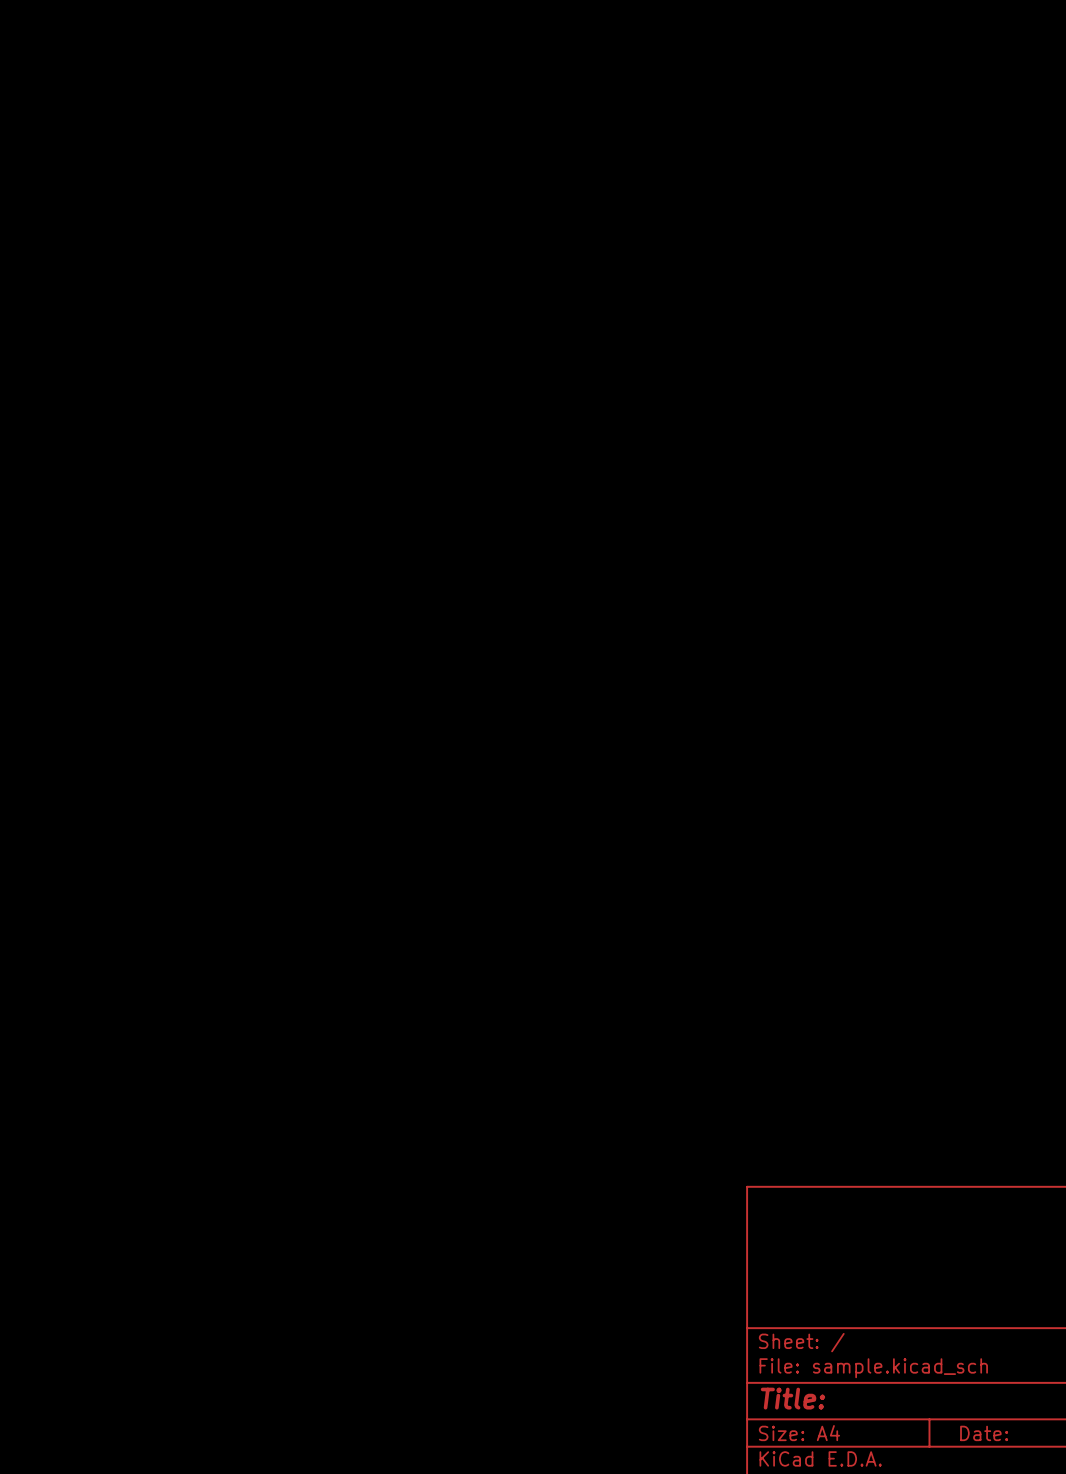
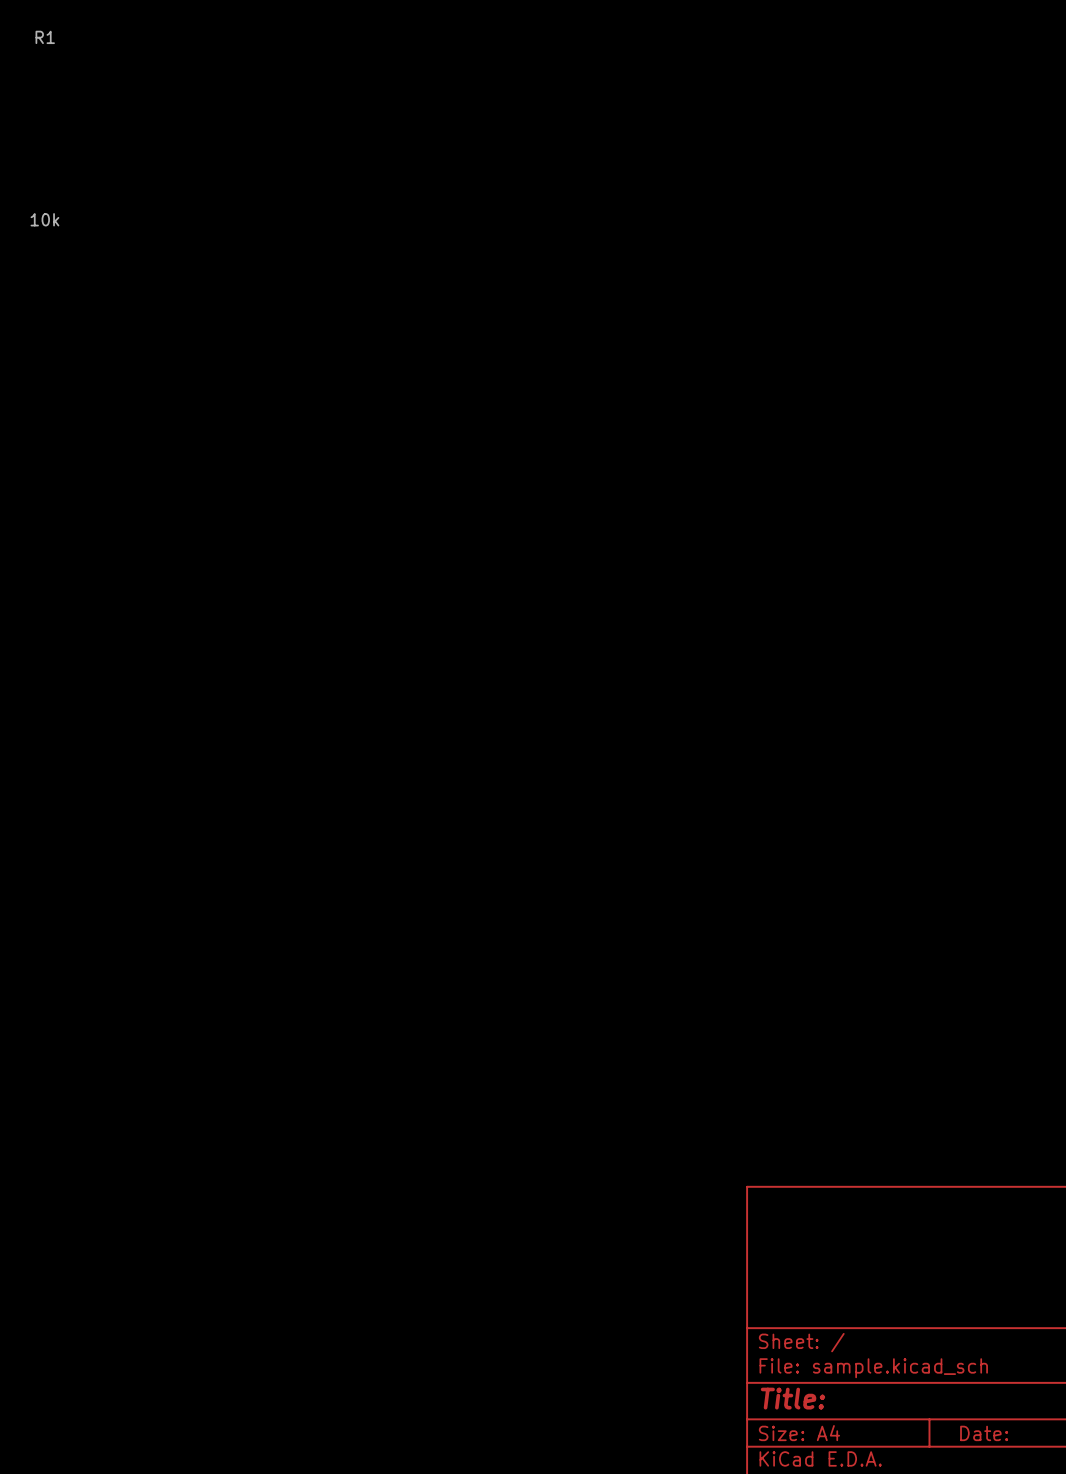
R1: none -> 10k (44, 128)

